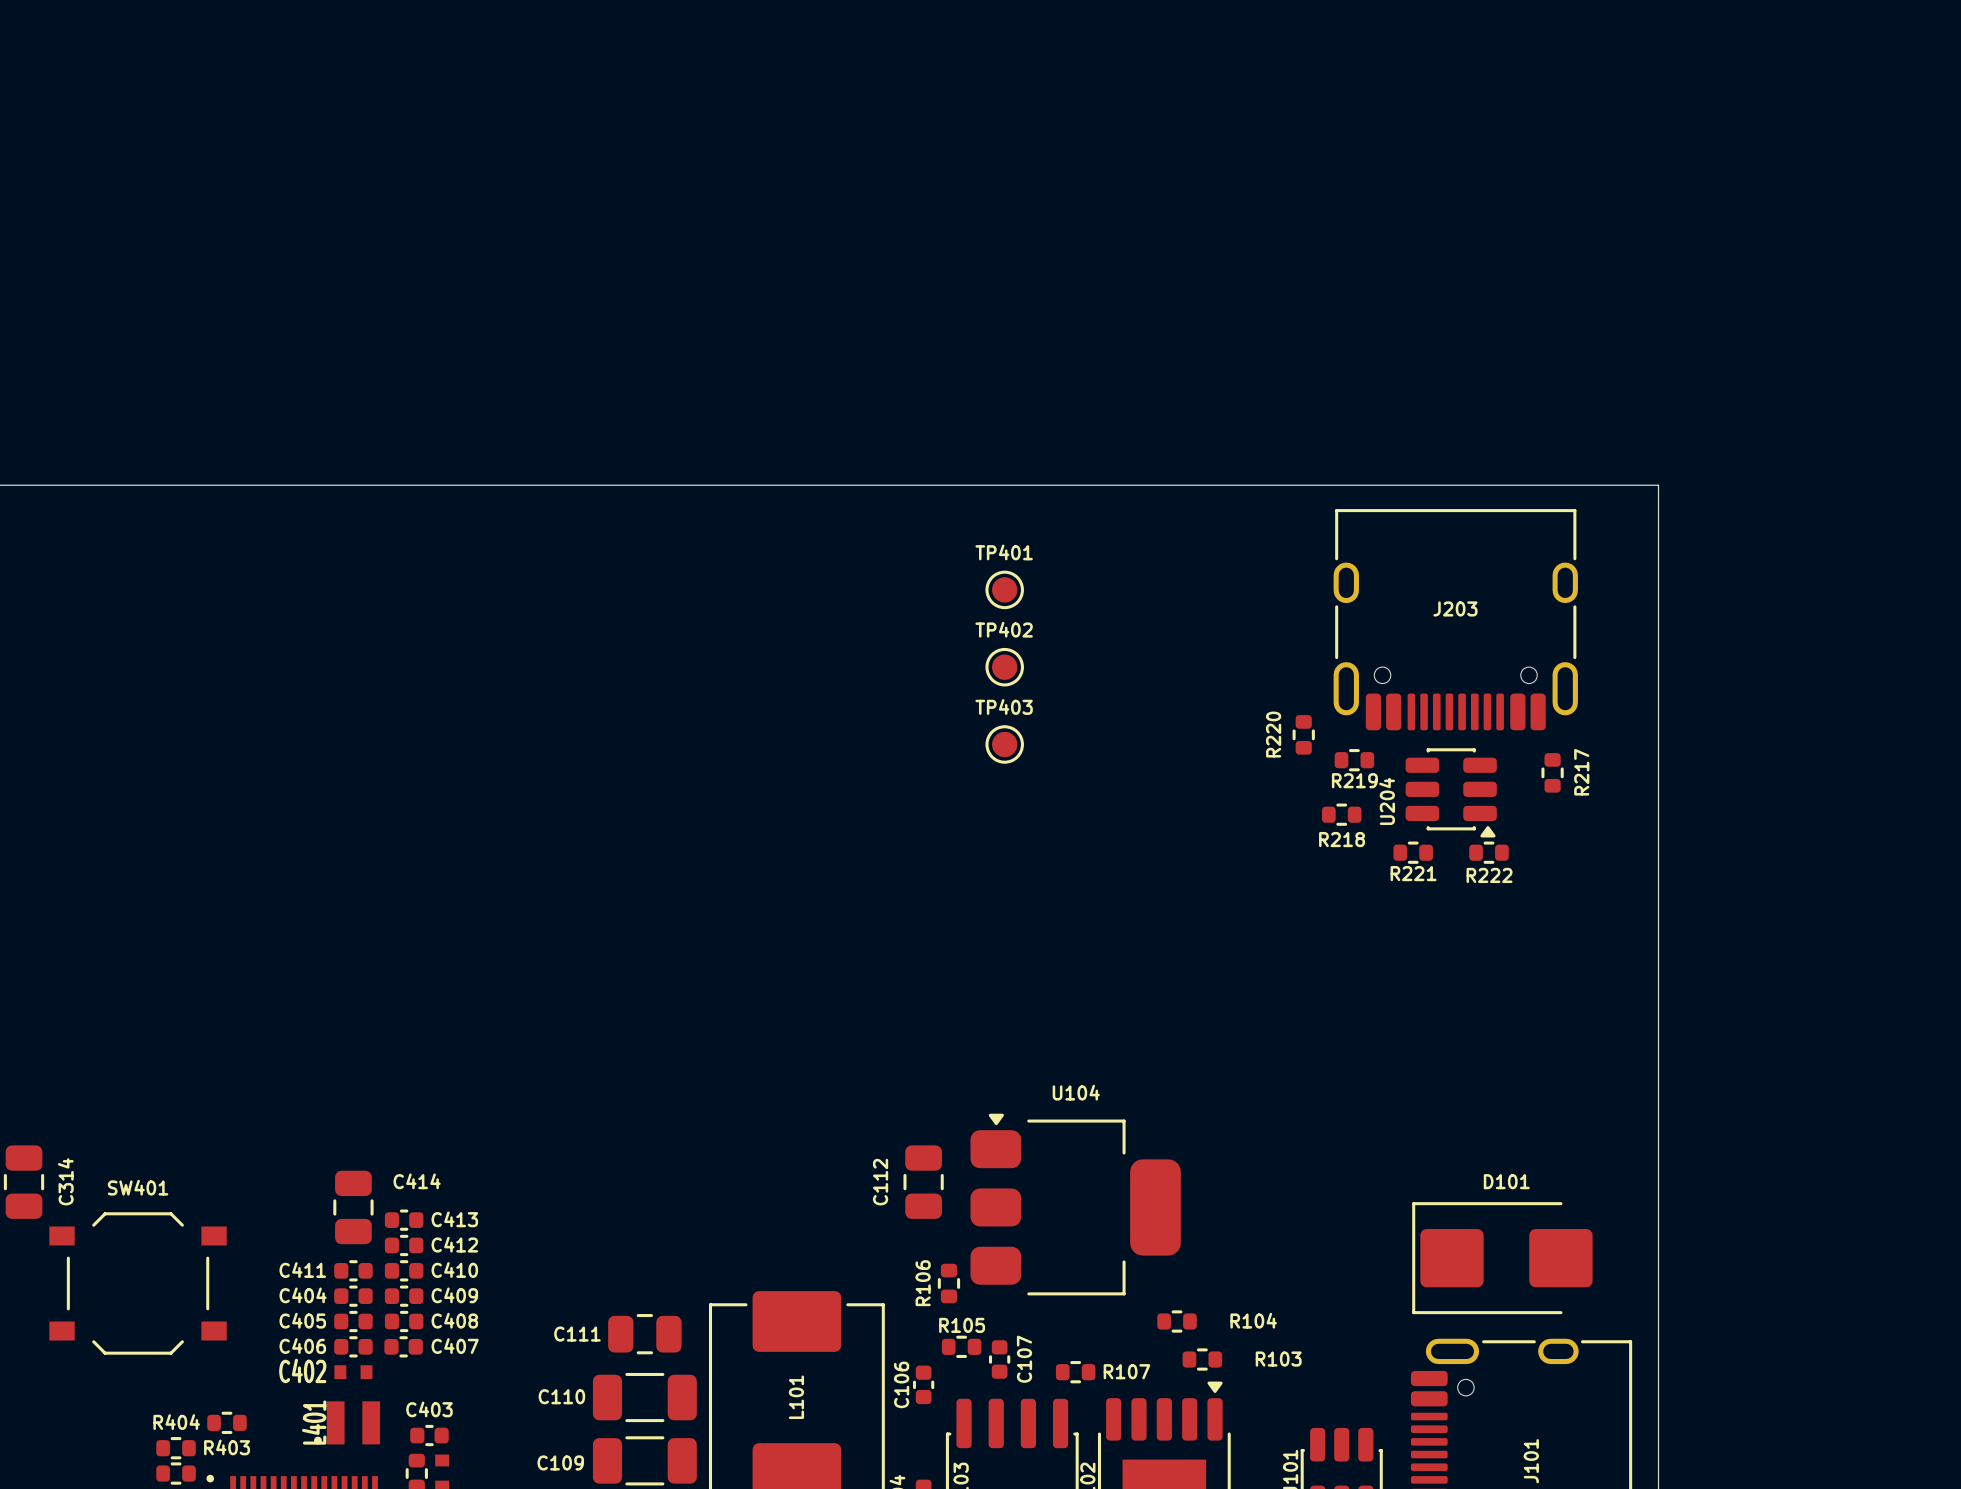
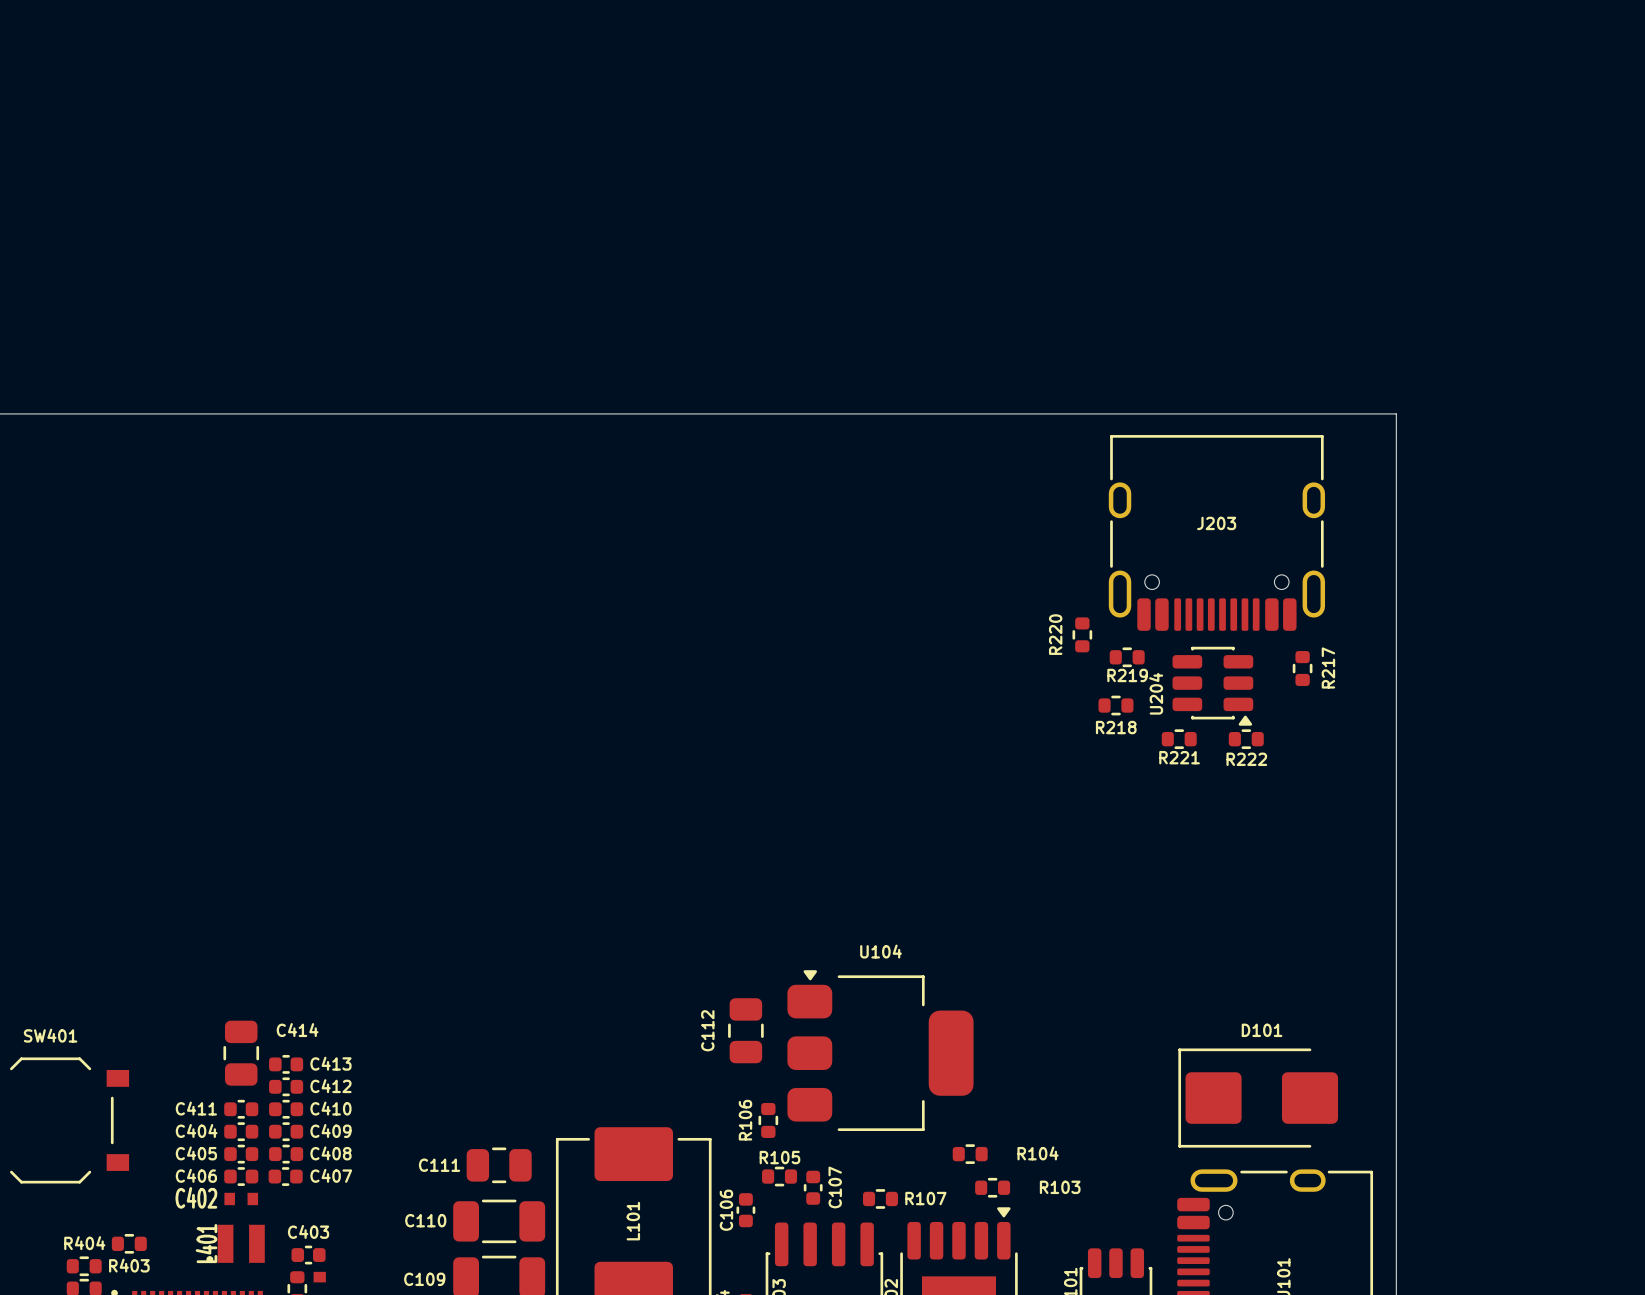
TP401: (1004, 589) -> none
TP402: (1004, 667) -> none
TP403: (1004, 744) -> none

